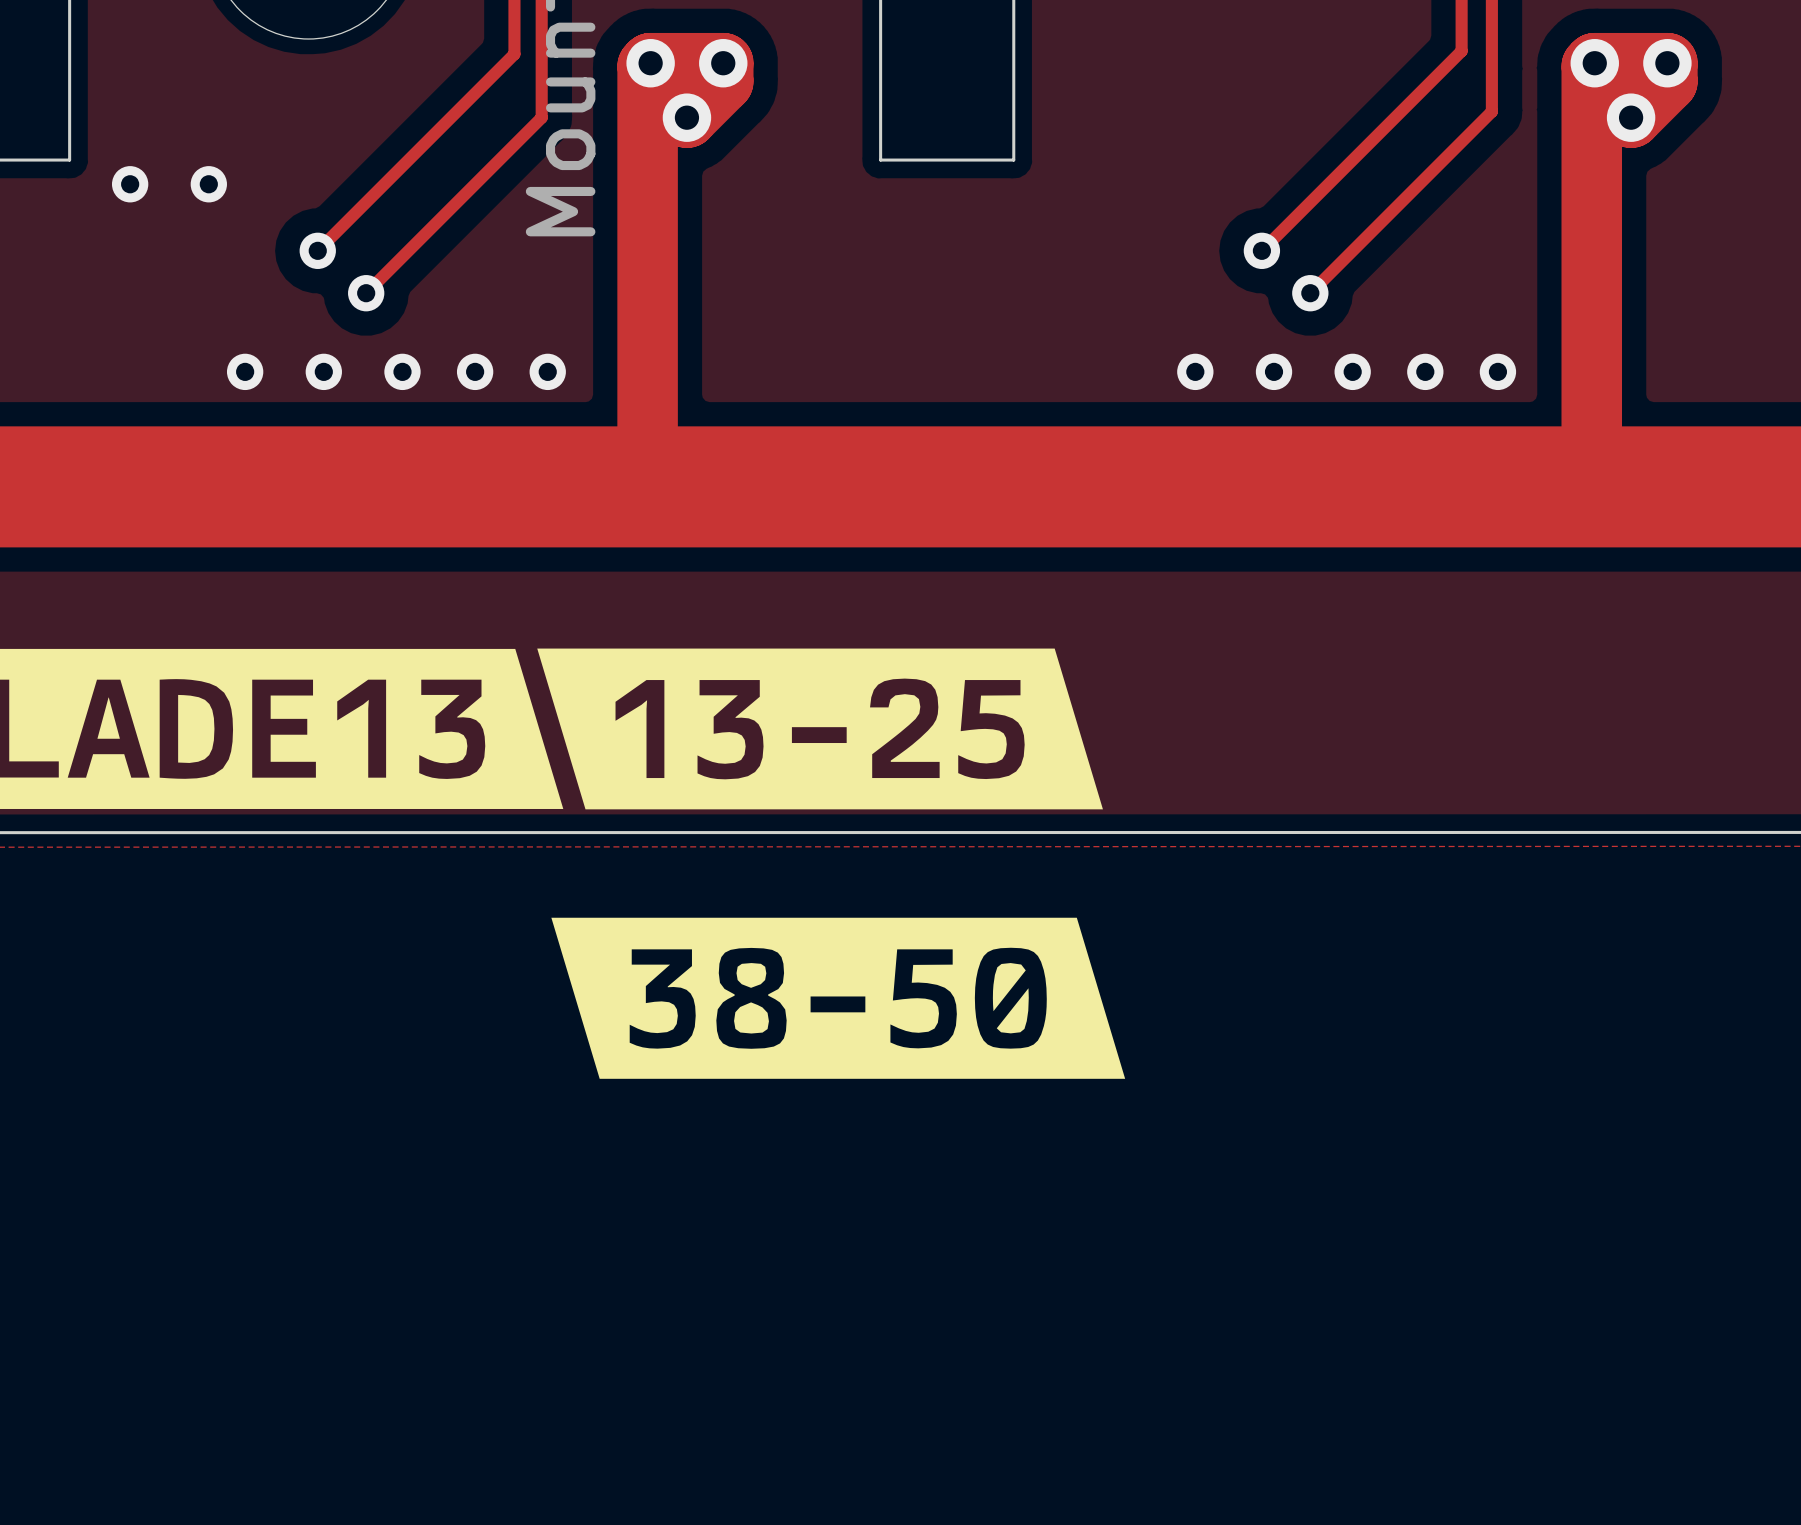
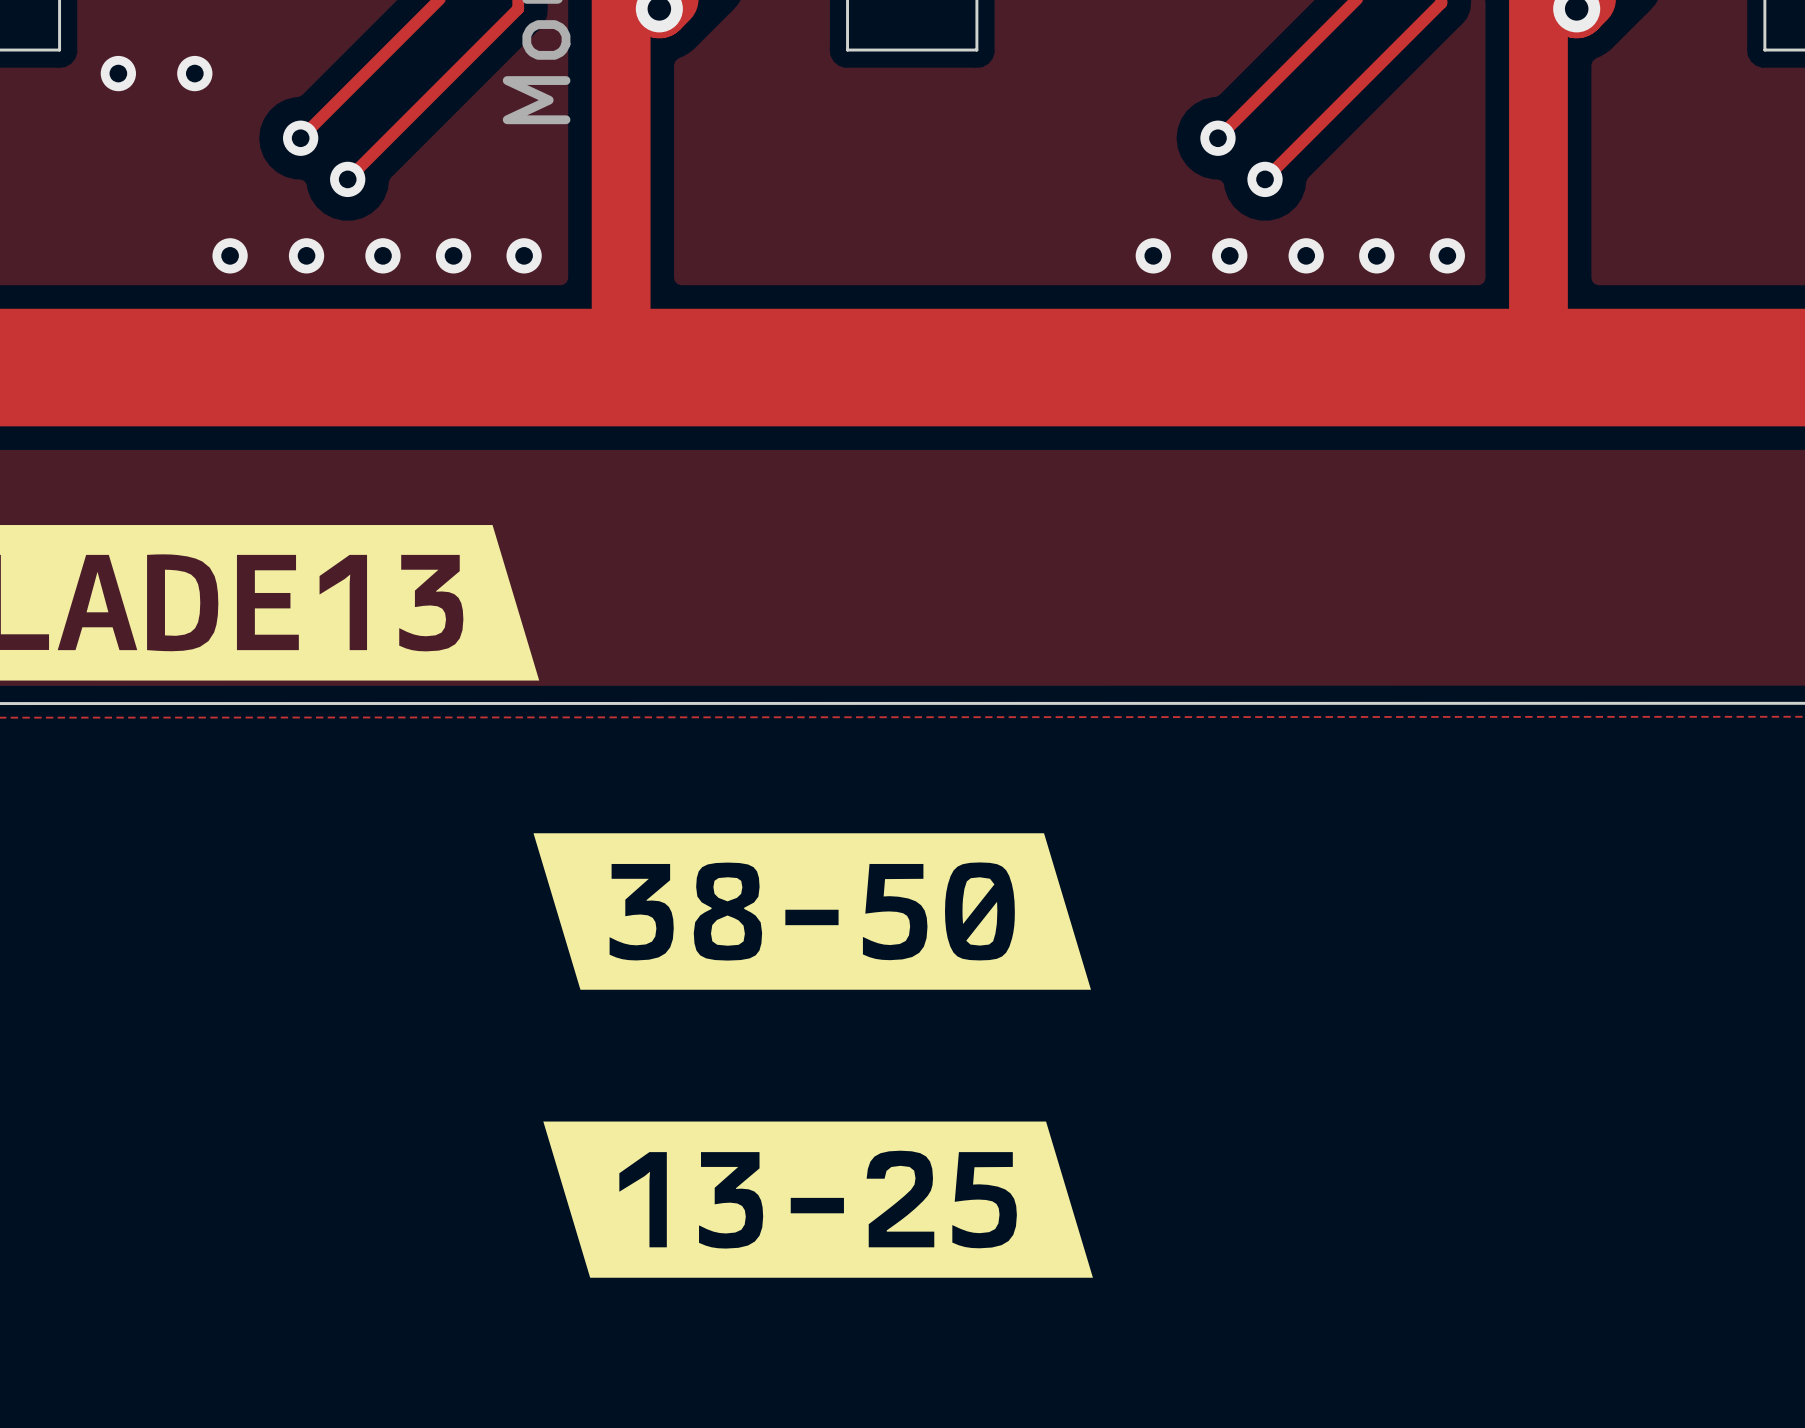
drawing position: (820, 728) -> (818, 1199)
drawing position: (838, 998) -> (812, 911)

